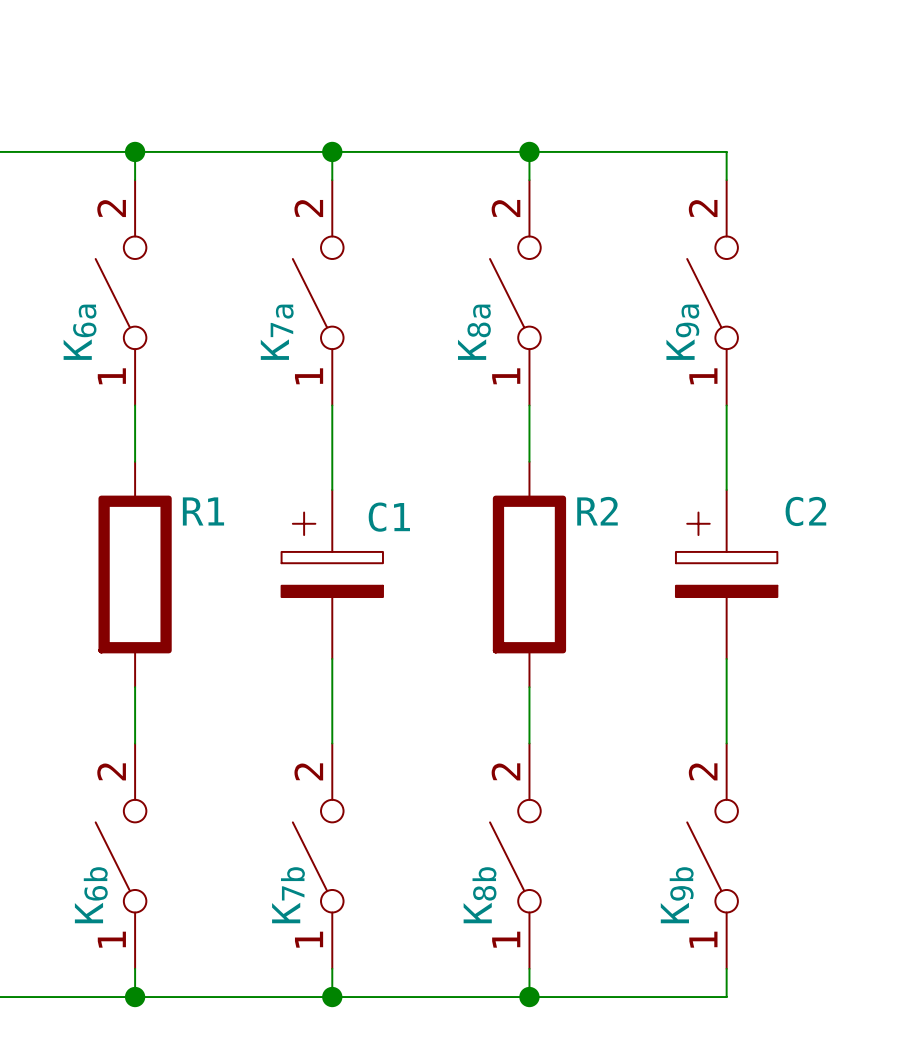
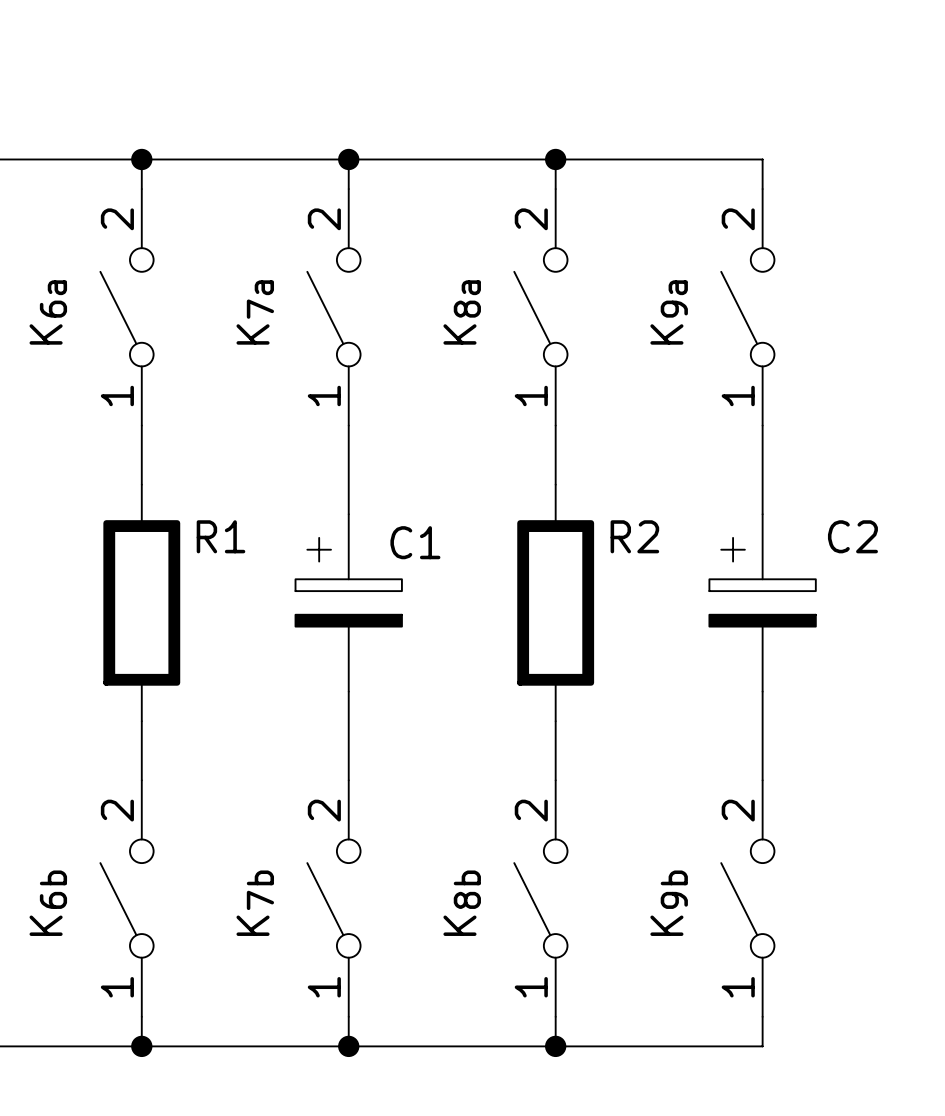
K6a name position: K6a (80, 332) -> K6a (48, 312)
K7a name position: K7a (277, 332) -> K7a (255, 312)
K8a name position: K8a (474, 332) -> K8a (462, 312)
K9a name position: K9a (682, 332) -> K9a (669, 312)
K6b name position: K6b (91, 895) -> K6b (48, 903)
K7b name position: K7b (288, 895) -> K7b (255, 903)
K8b name position: K8b (480, 895) -> K8b (462, 903)
K9b name position: K9b (677, 895) -> K9b (669, 903)

